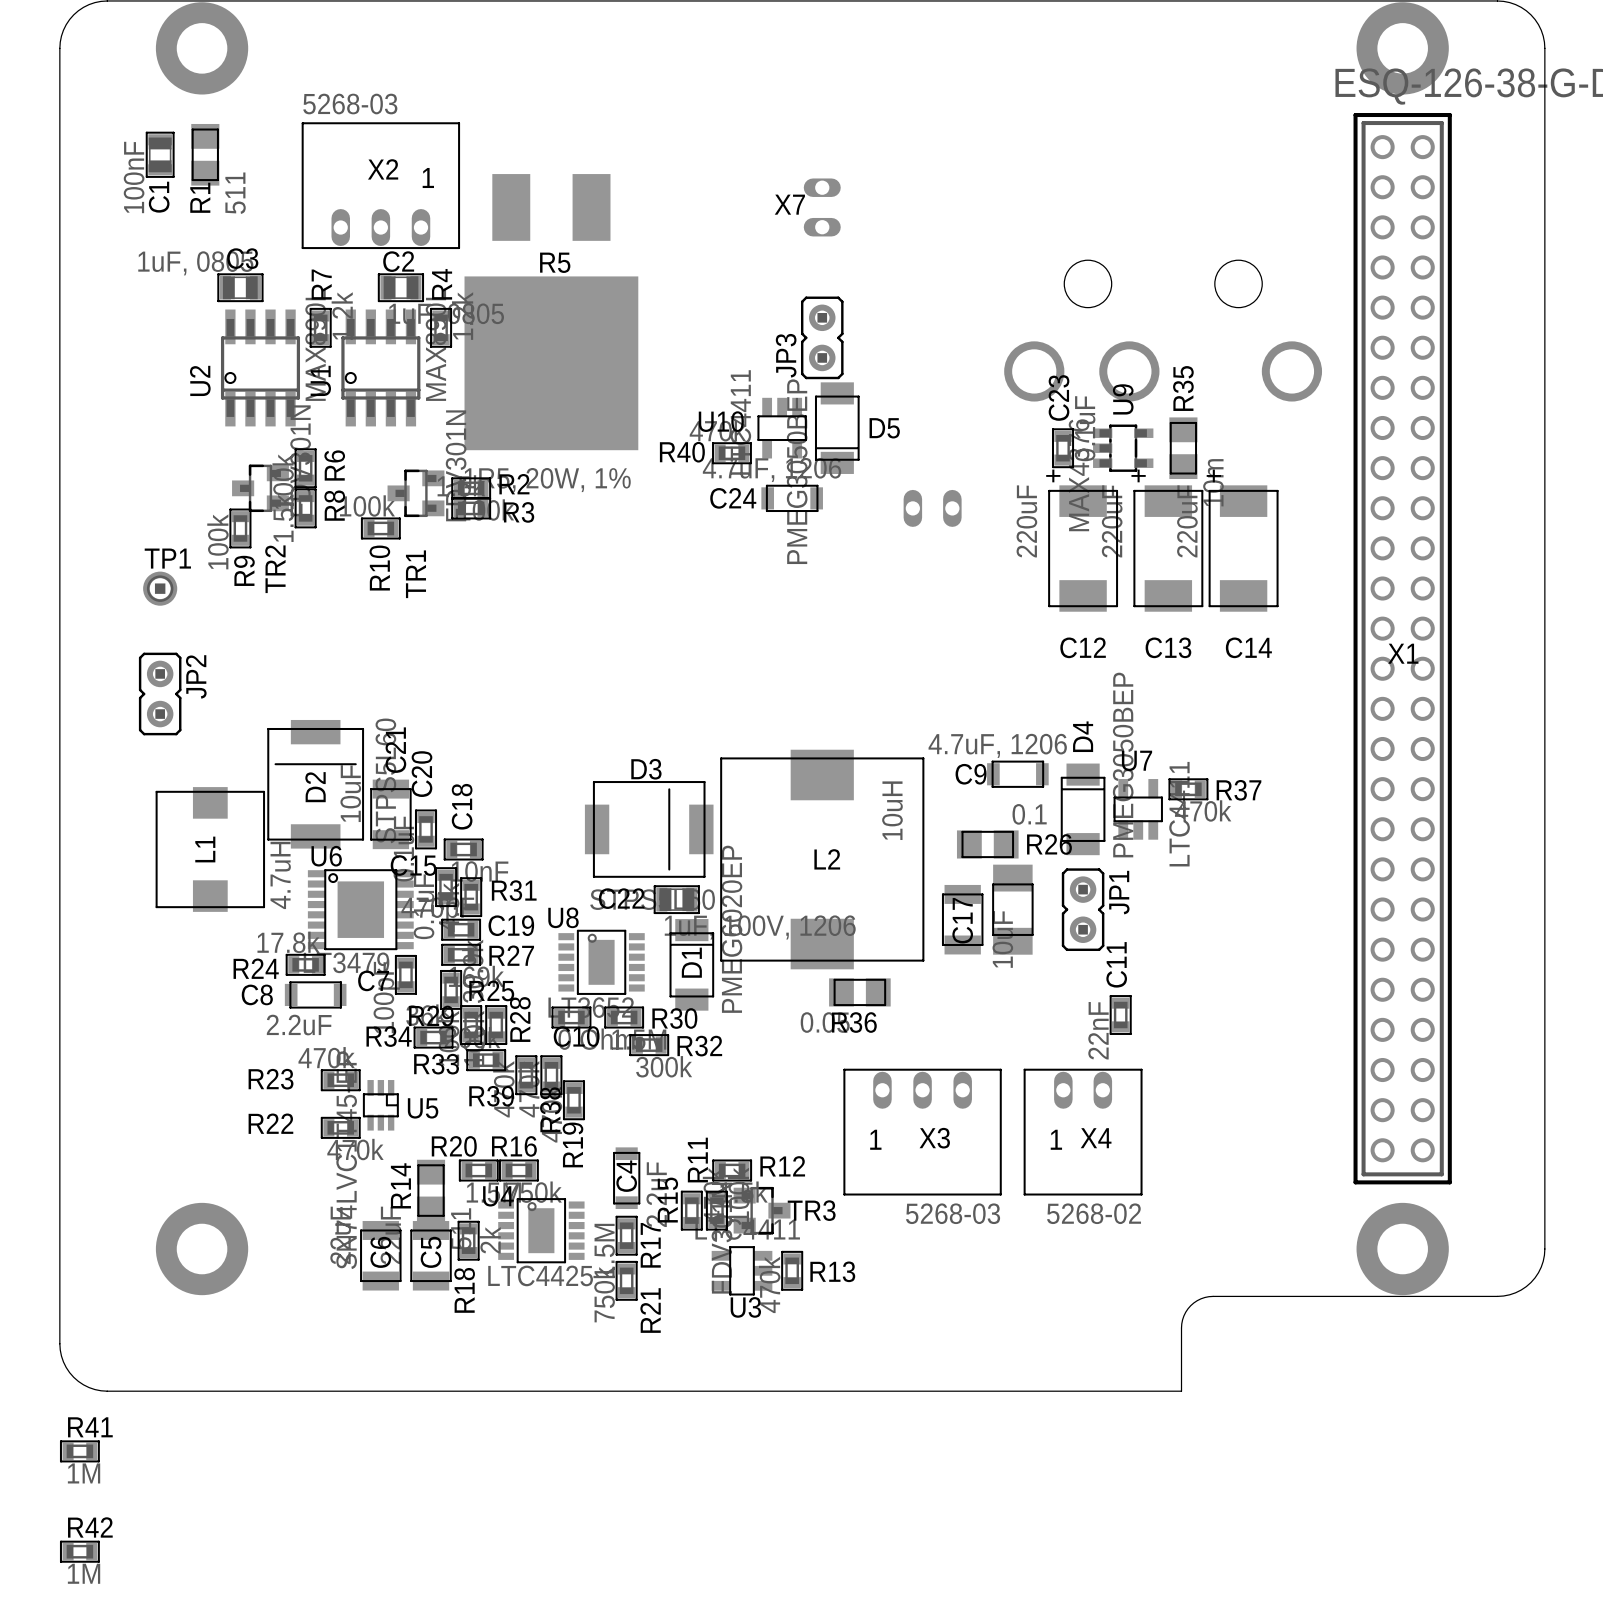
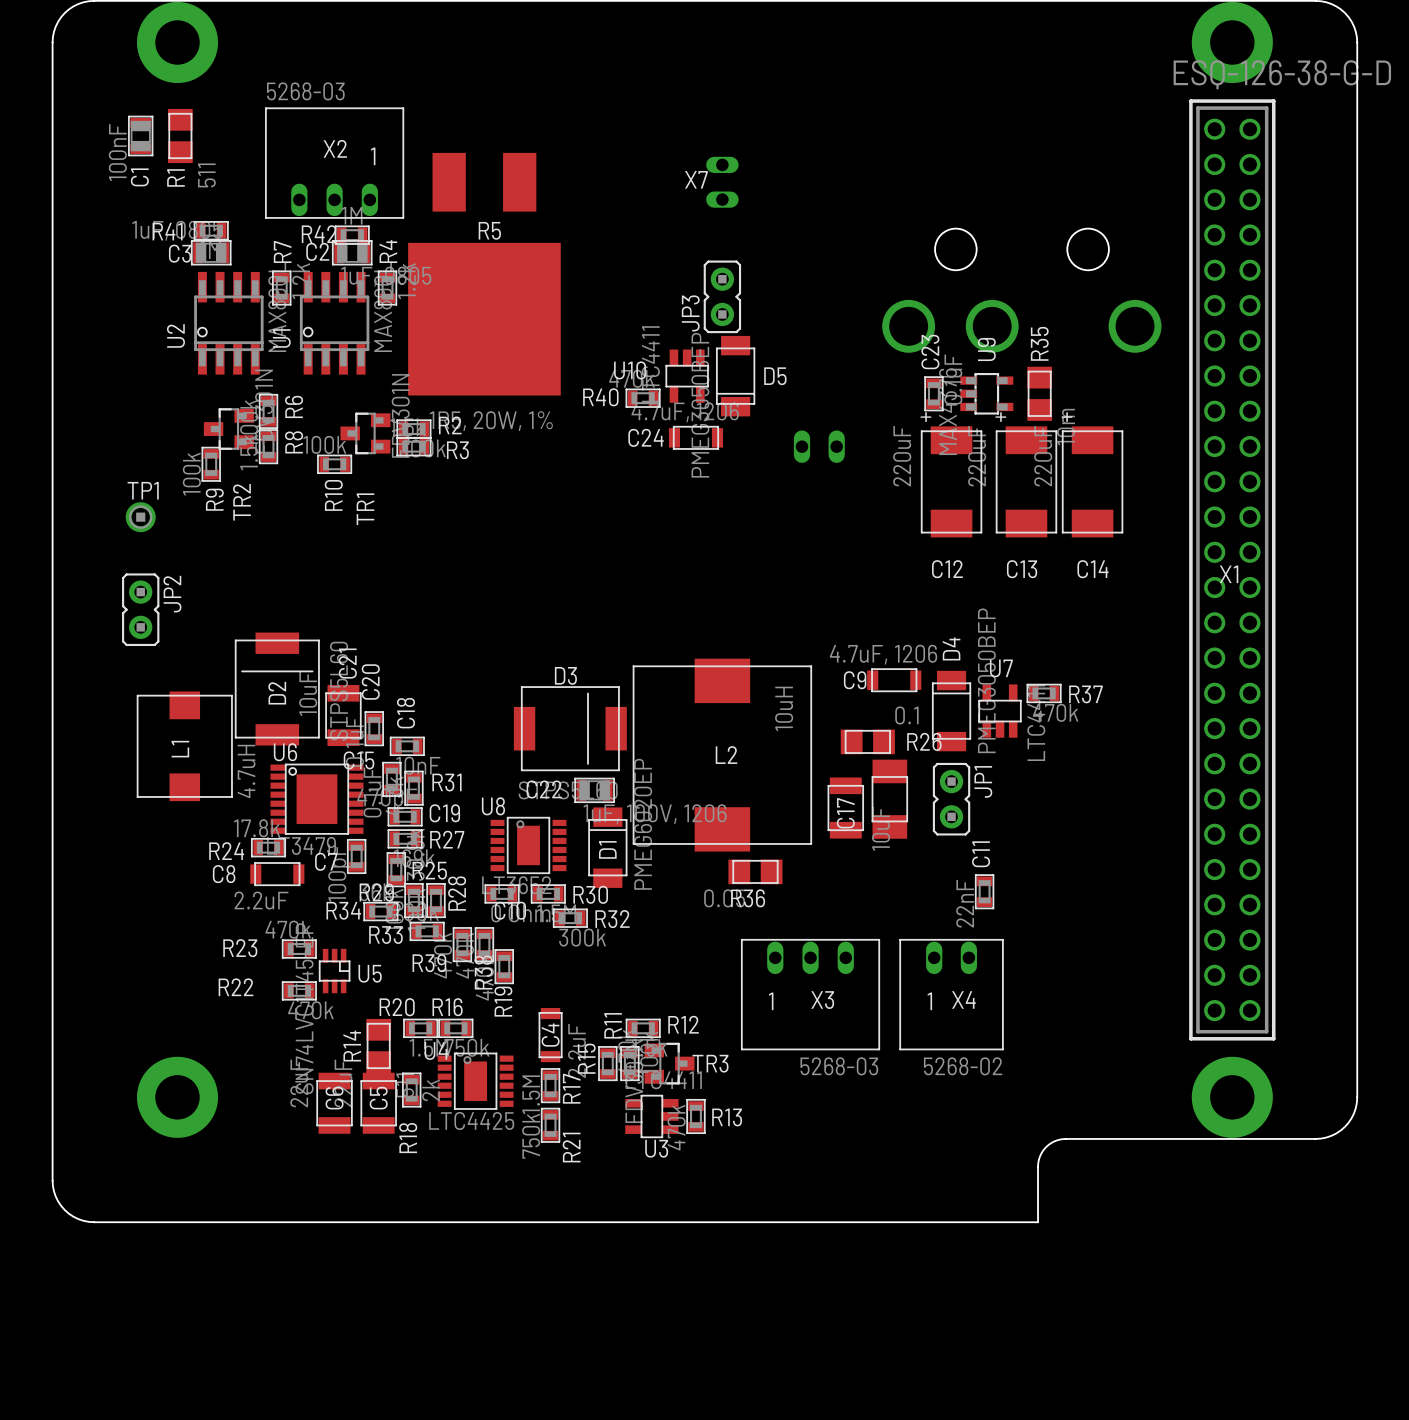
C3 name position: C3 (242, 258) -> C3 (180, 253)
C2 name position: C2 (398, 261) -> C2 (317, 251)
R41 name position: R41 (90, 1427) -> R41 (167, 231)
R41 position: (79, 1451) -> (211, 230)
R42 name position: R42 (90, 1527) -> R42 (319, 234)
R42 position: (79, 1551) -> (352, 235)
R42 value position: 1M (84, 1573) -> 1M (352, 215)

